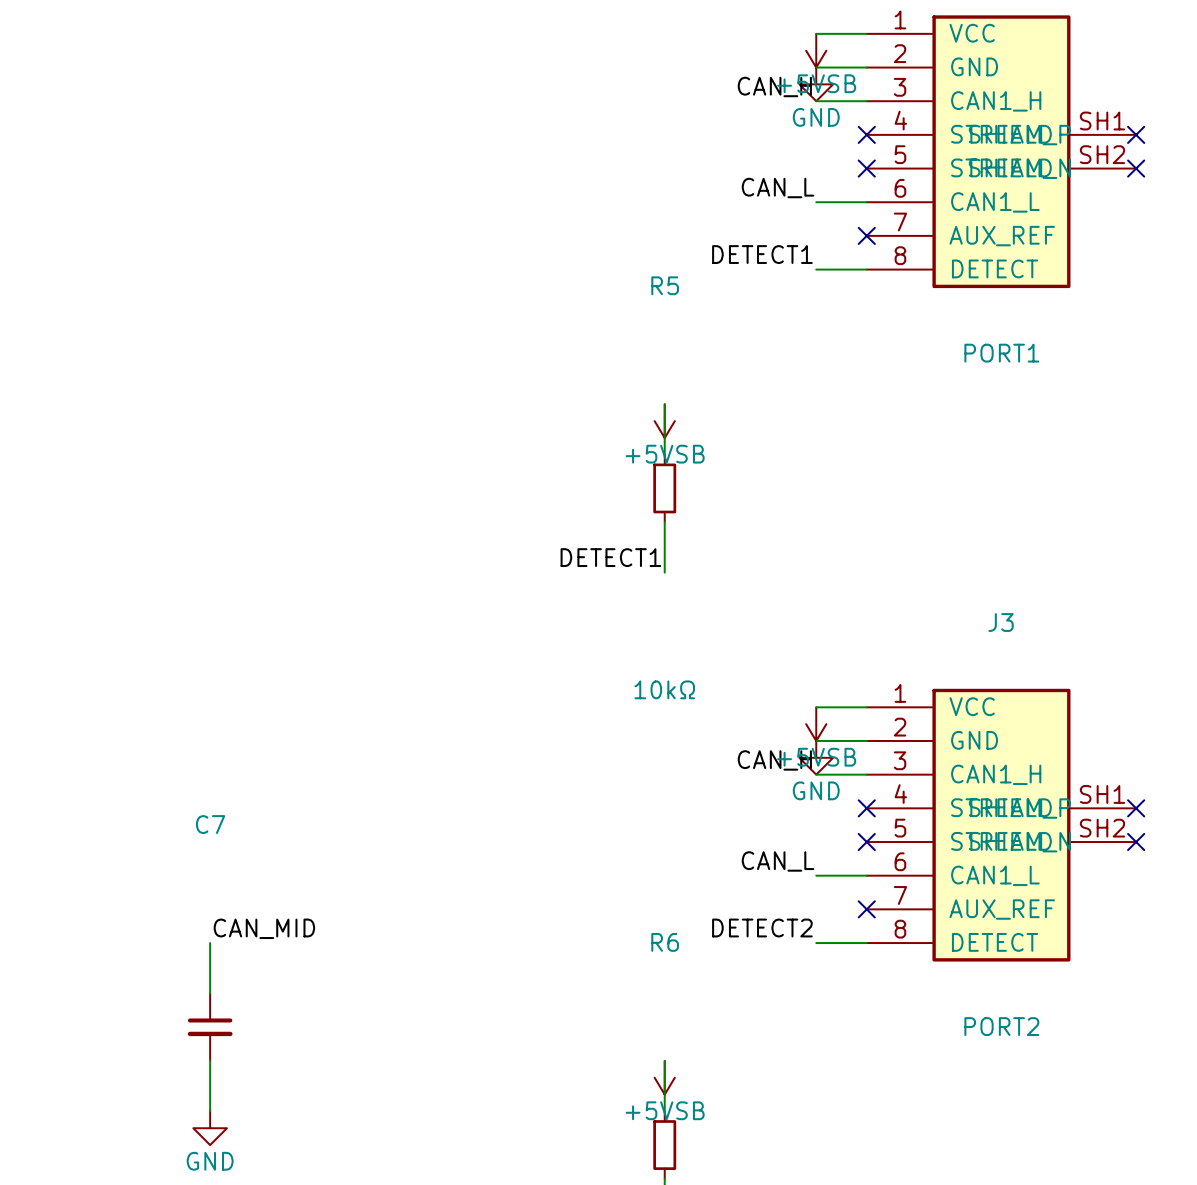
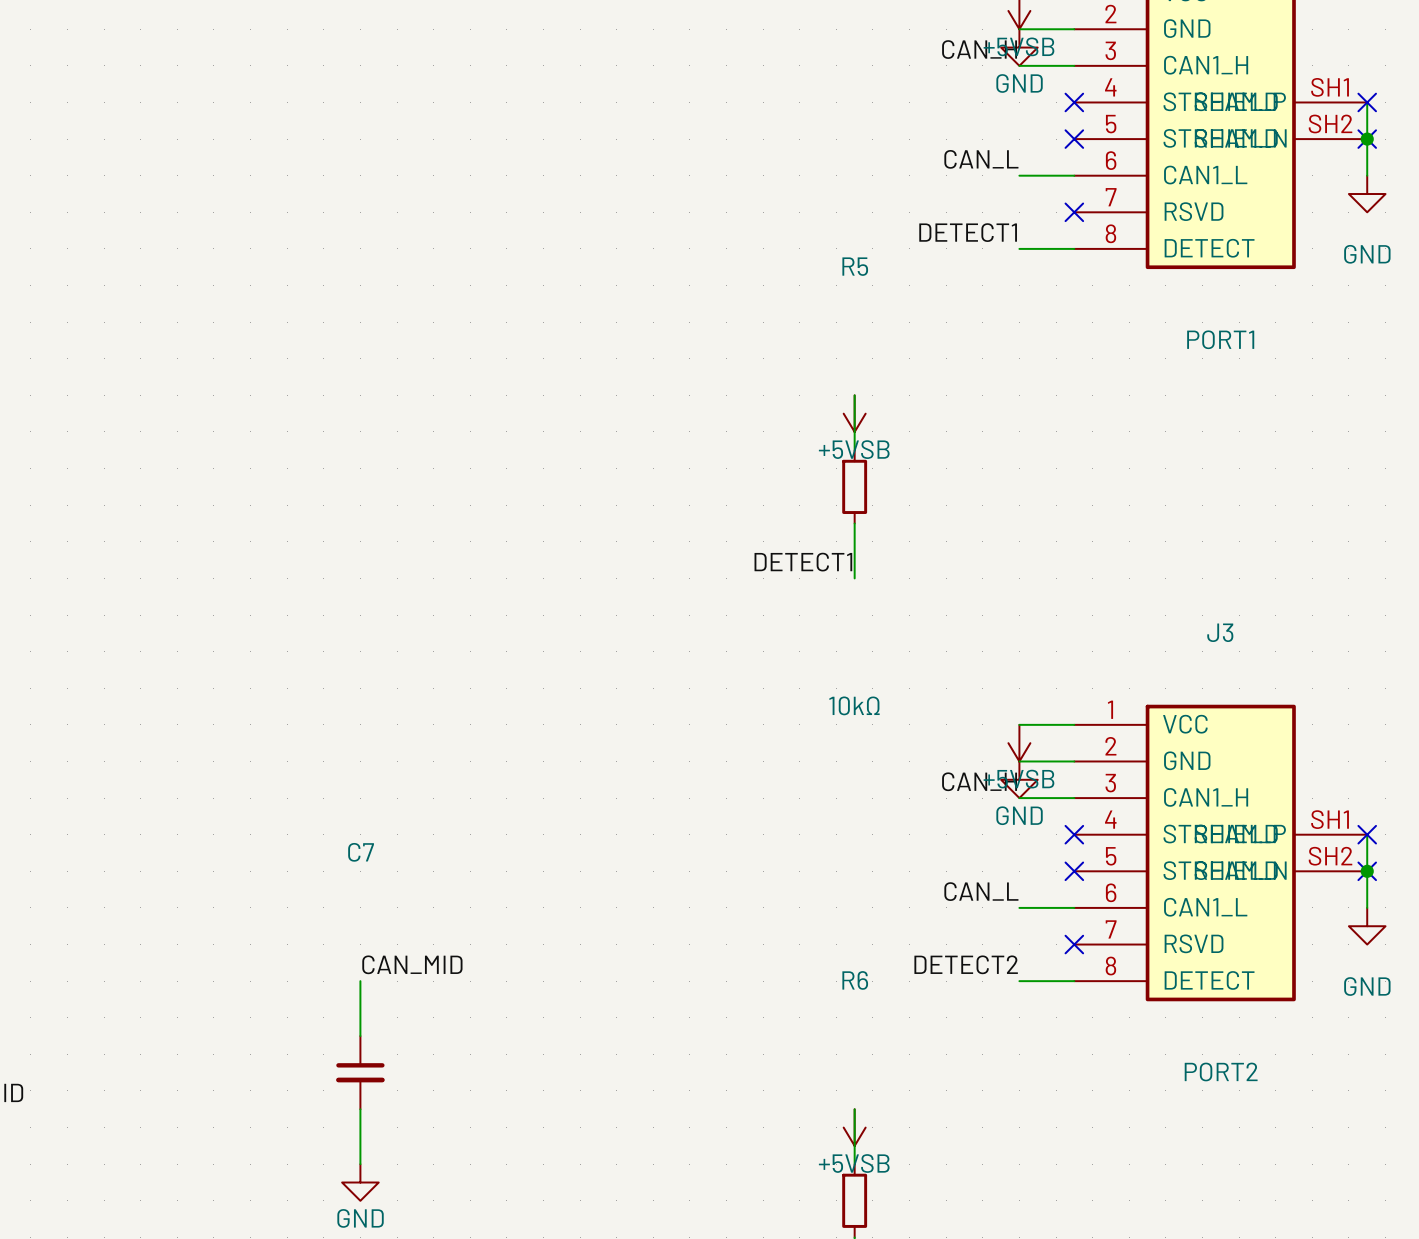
wire: none -> (1367, 102) (1367, 175)
junction: none -> (1367, 139)
power symbol: none -> GND (1367, 194)
part pin name: AUX_REF (1002, 236) -> RSVD (1194, 211)
wire: none -> (1367, 834) (1367, 907)
junction: none -> (1367, 871)
power symbol: none -> GND (1367, 926)
J3 pin name: AUX_REF (1002, 909) -> RSVD (1194, 943)

